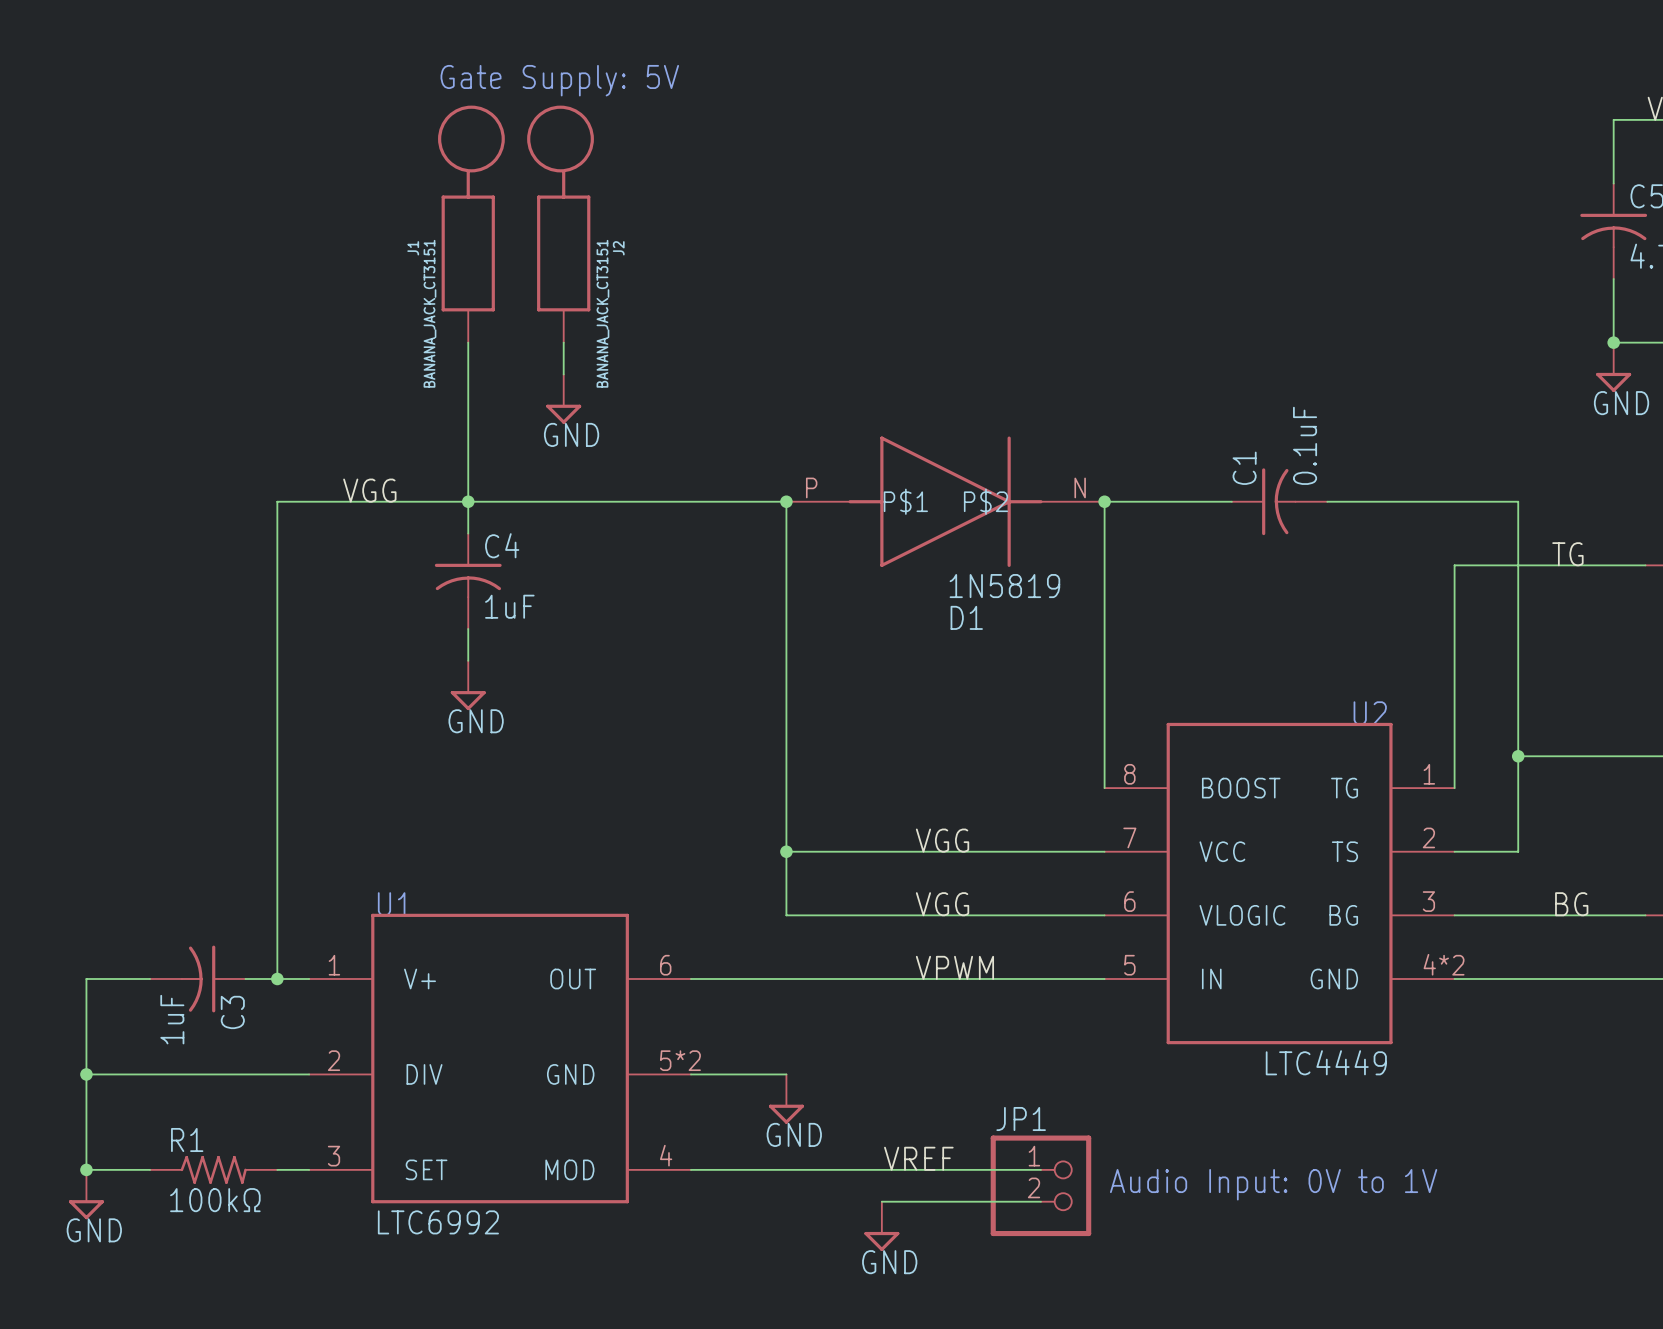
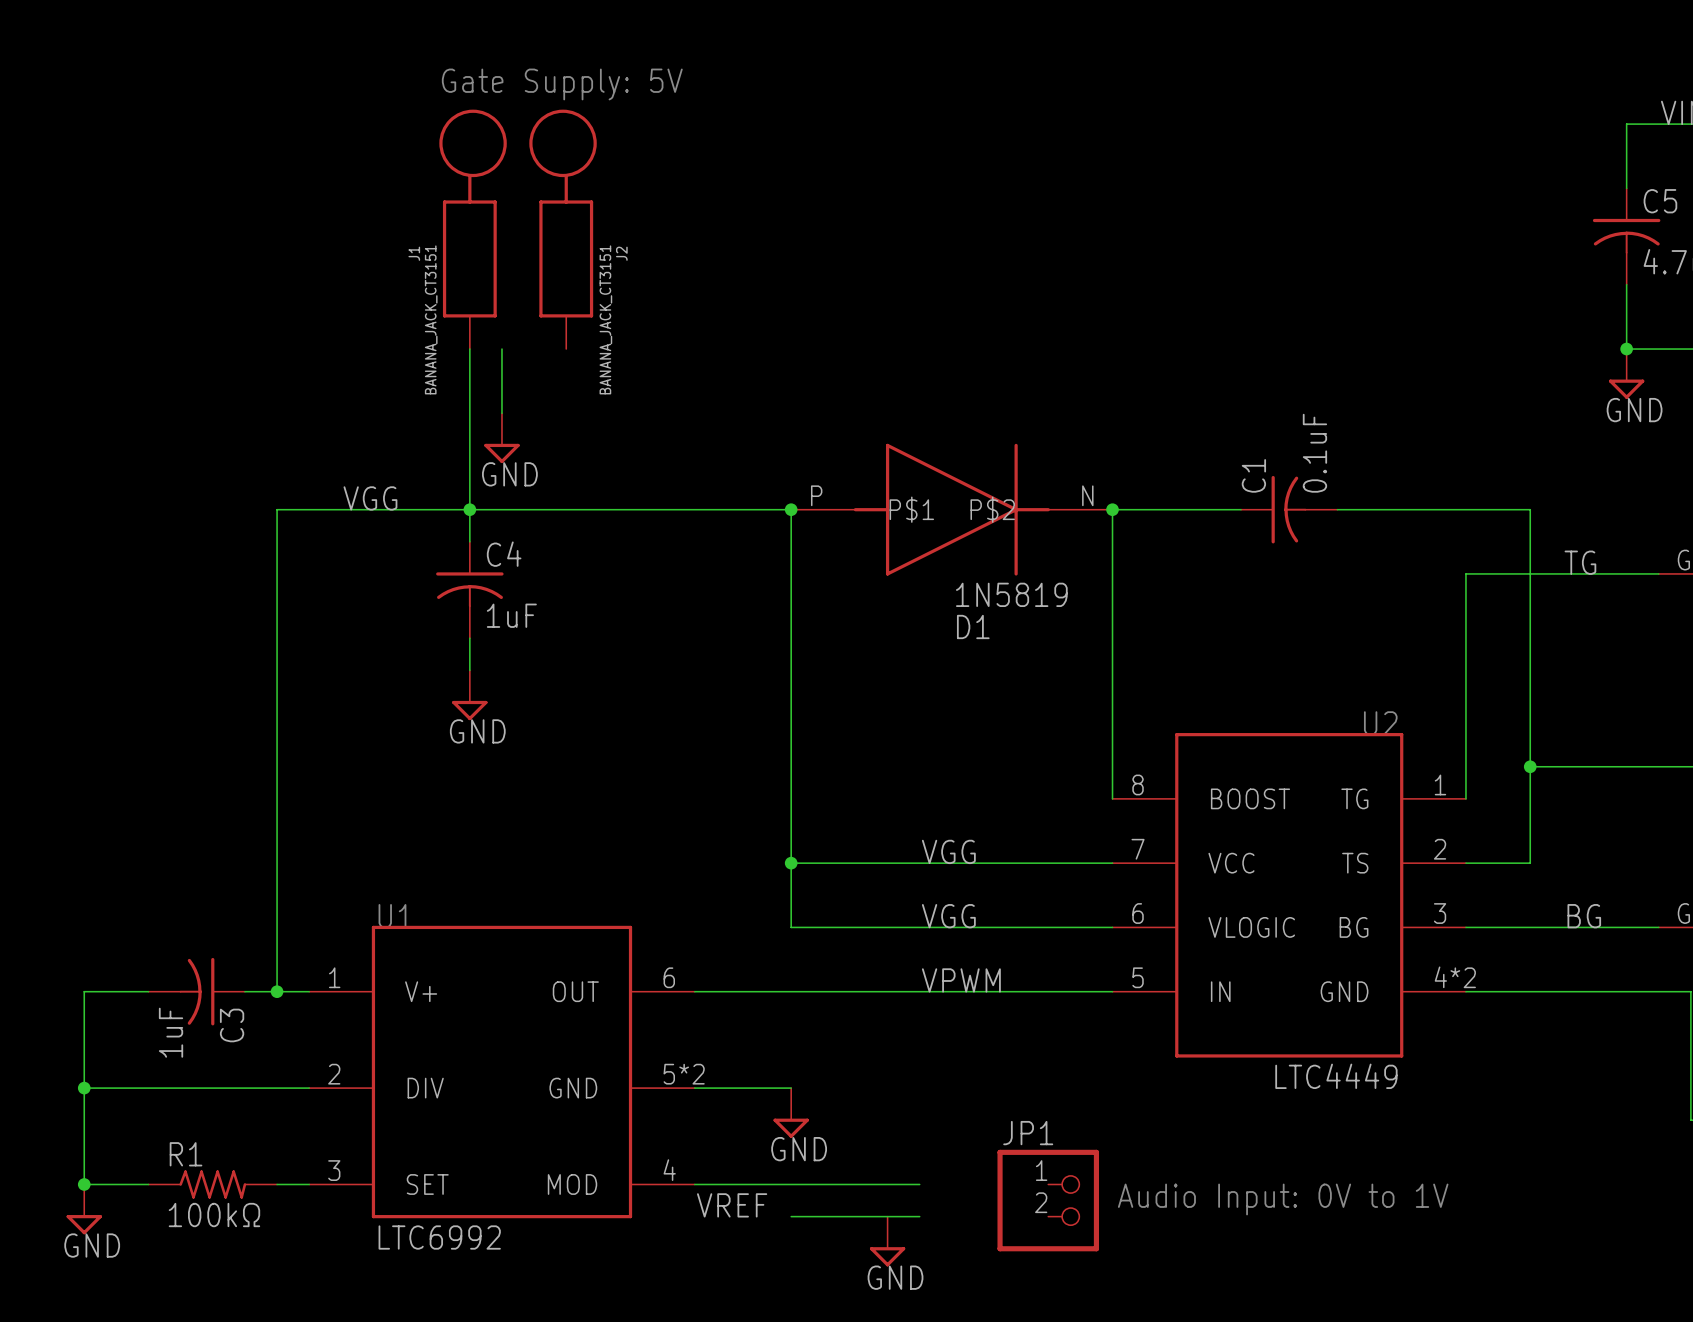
wire: none -> (501, 349) (501, 413)
wire: (563, 342) (563, 374) -> none
power symbol position: GND (563, 399) -> GND (501, 438)
label position: VREF (918, 1158) -> VREF (732, 1205)
wire: (913, 1169) (1040, 1169) -> none
wire: none -> (791, 1216) (887, 1216)
wire: (913, 1201) (1040, 1201) -> none

